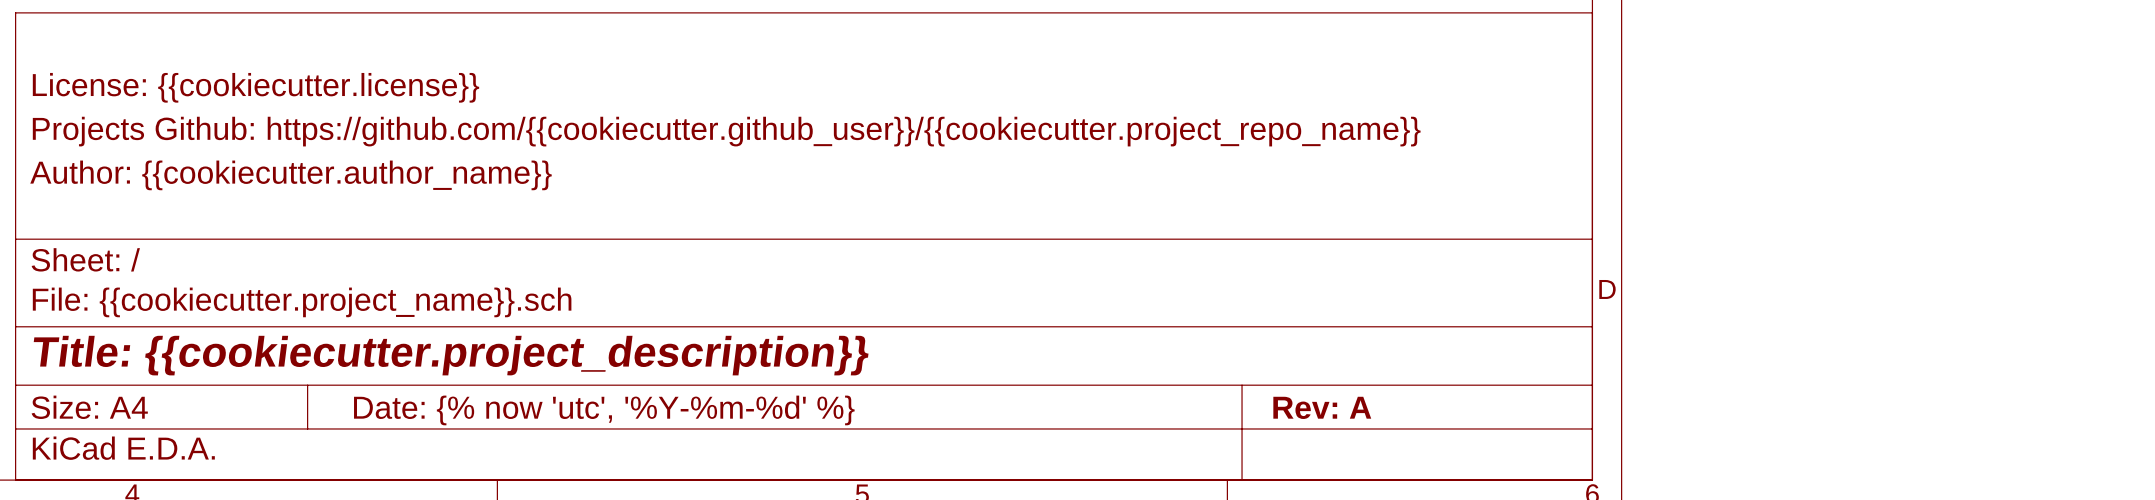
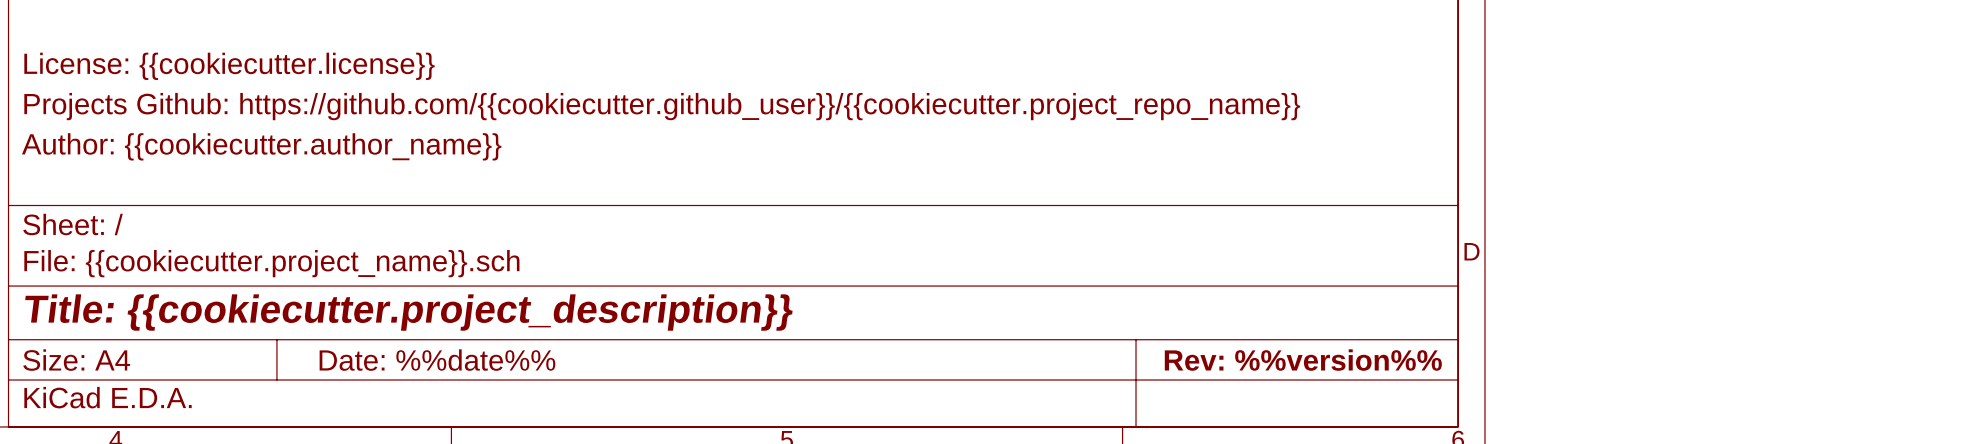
title block: Rev: A (1322, 407) -> Rev: %%version%% (1303, 360)
title block: Date: {% now 'utc', '%Y-%m-%d' %} (604, 410) -> Date: %%date%% (437, 360)

